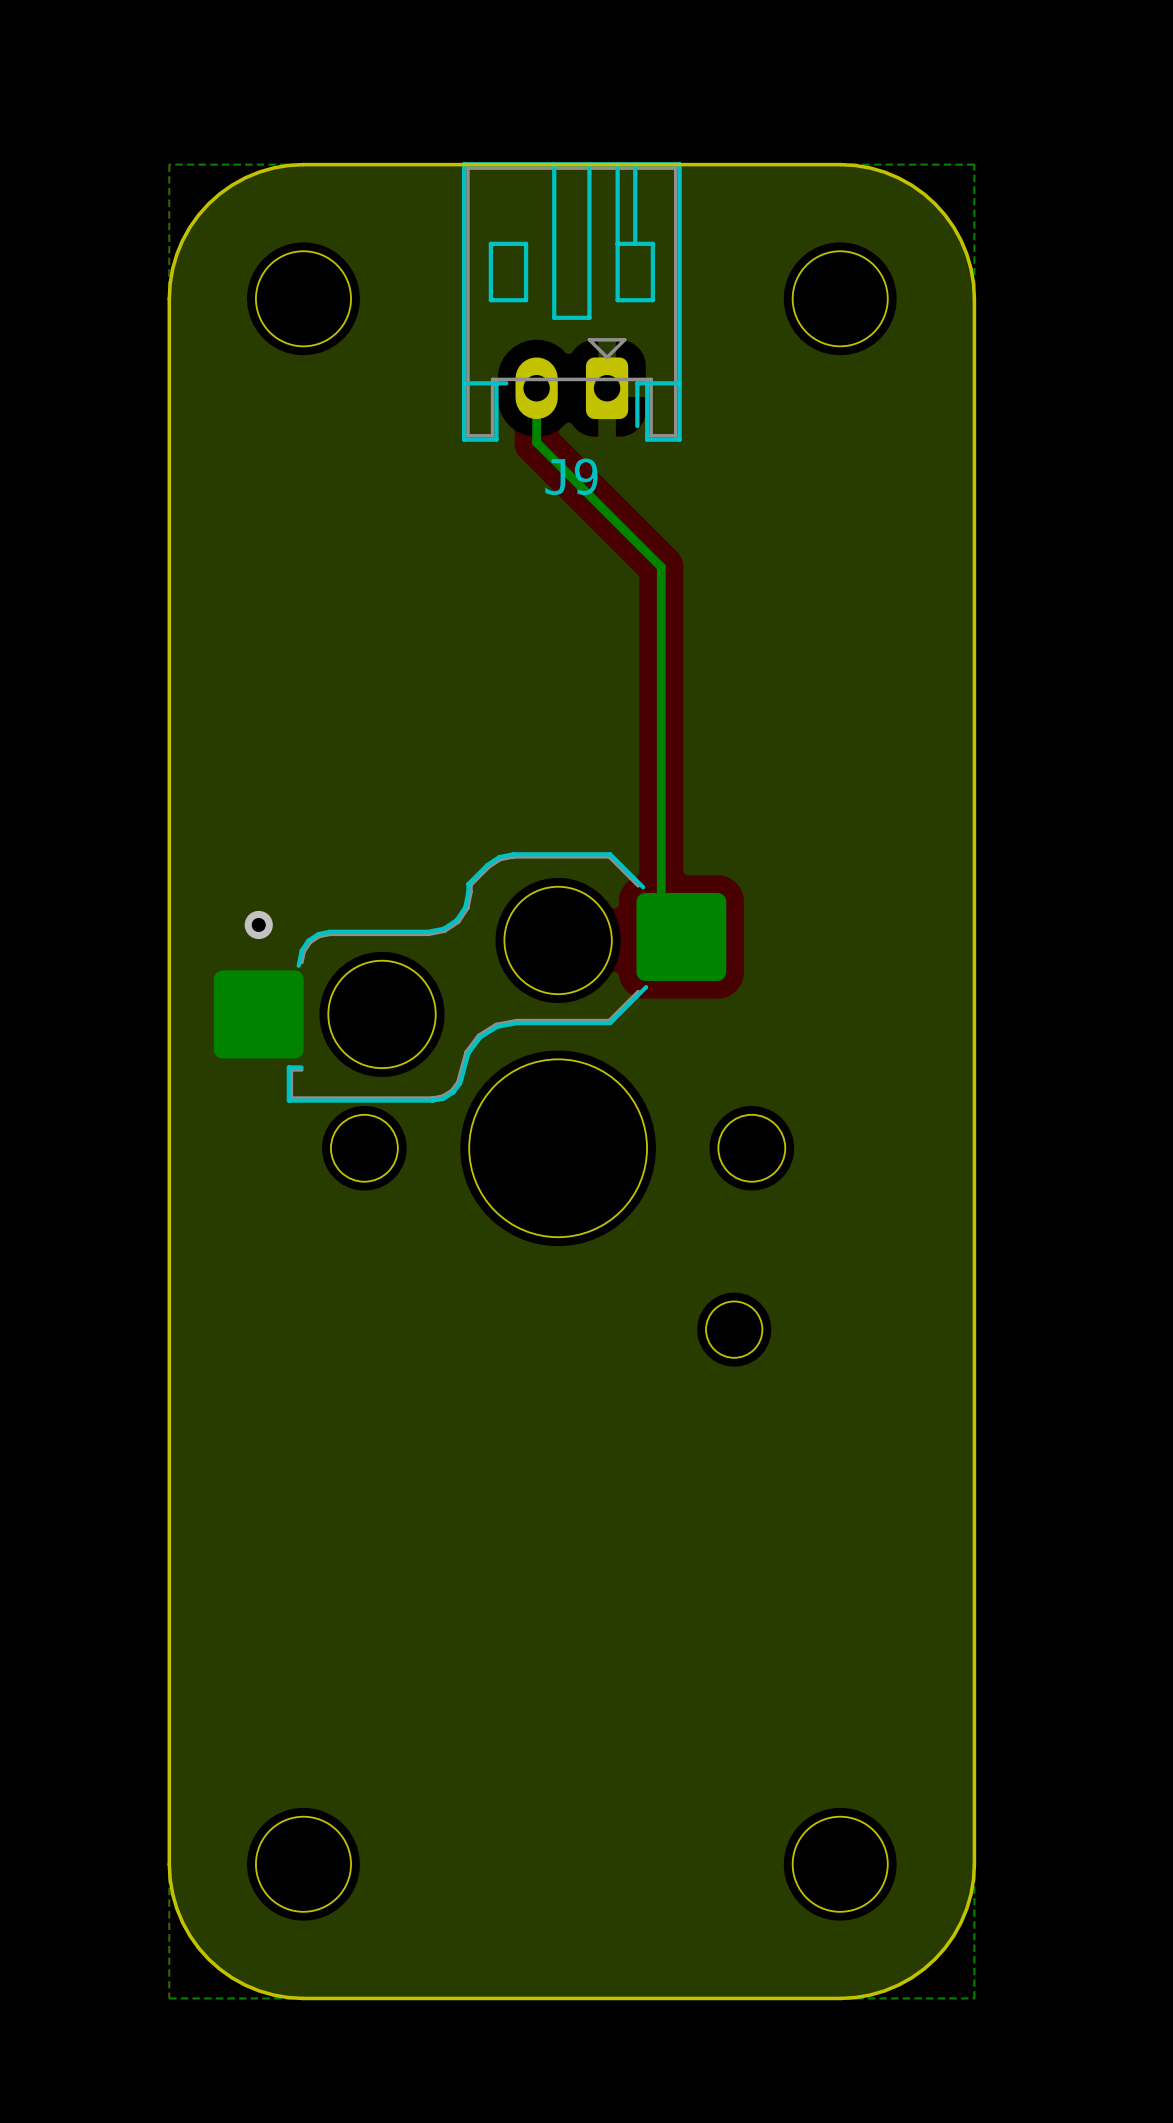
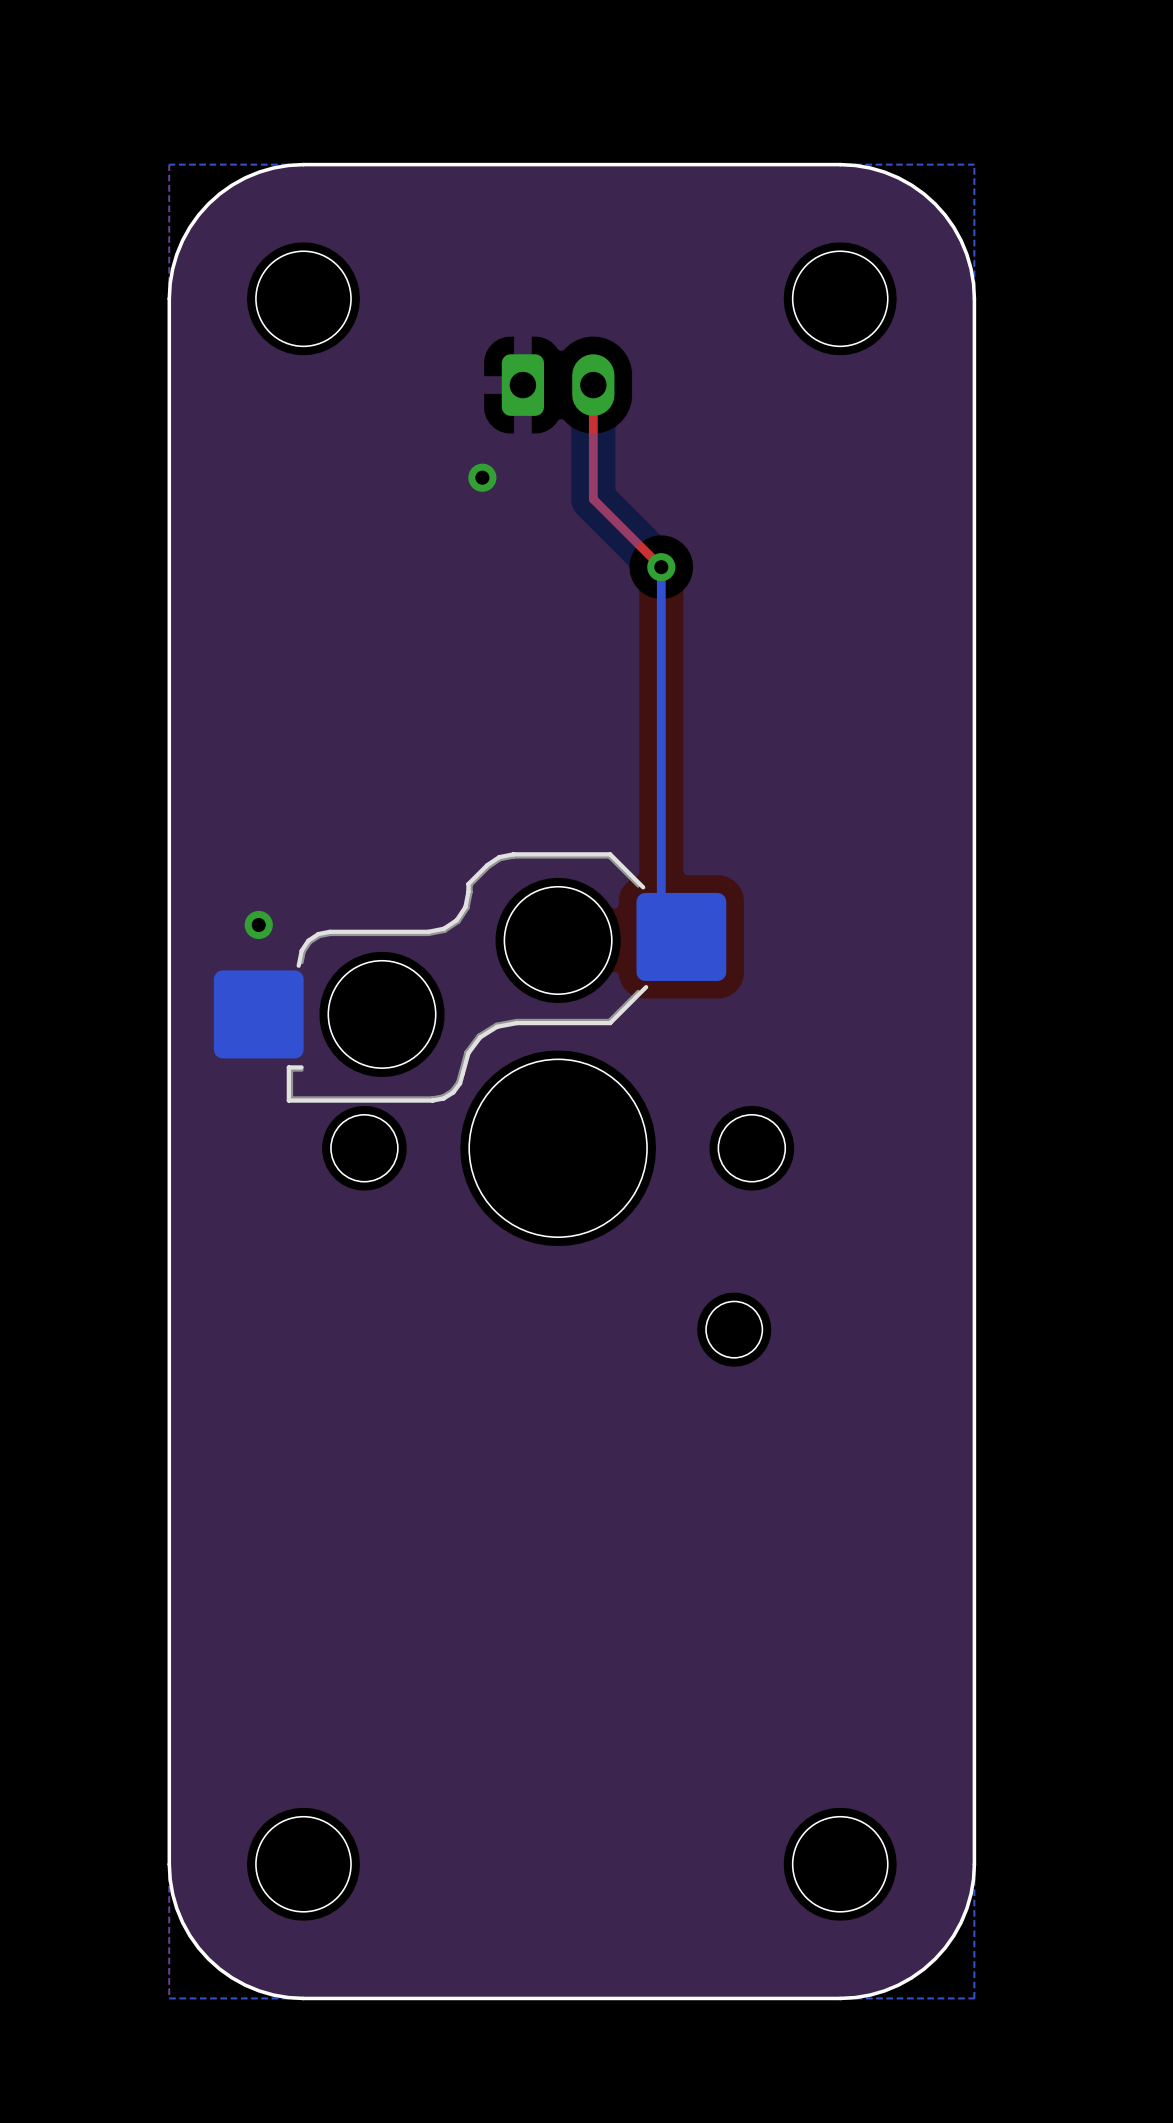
J9 side: bottom (571, 301) -> top (558, 385)
top track: none -> (593, 385) (593, 499) (661, 567)
bottom track: (536, 388) (536, 442) (661, 567) -> none
via: none -> (482, 477)
via: none -> (661, 567)

